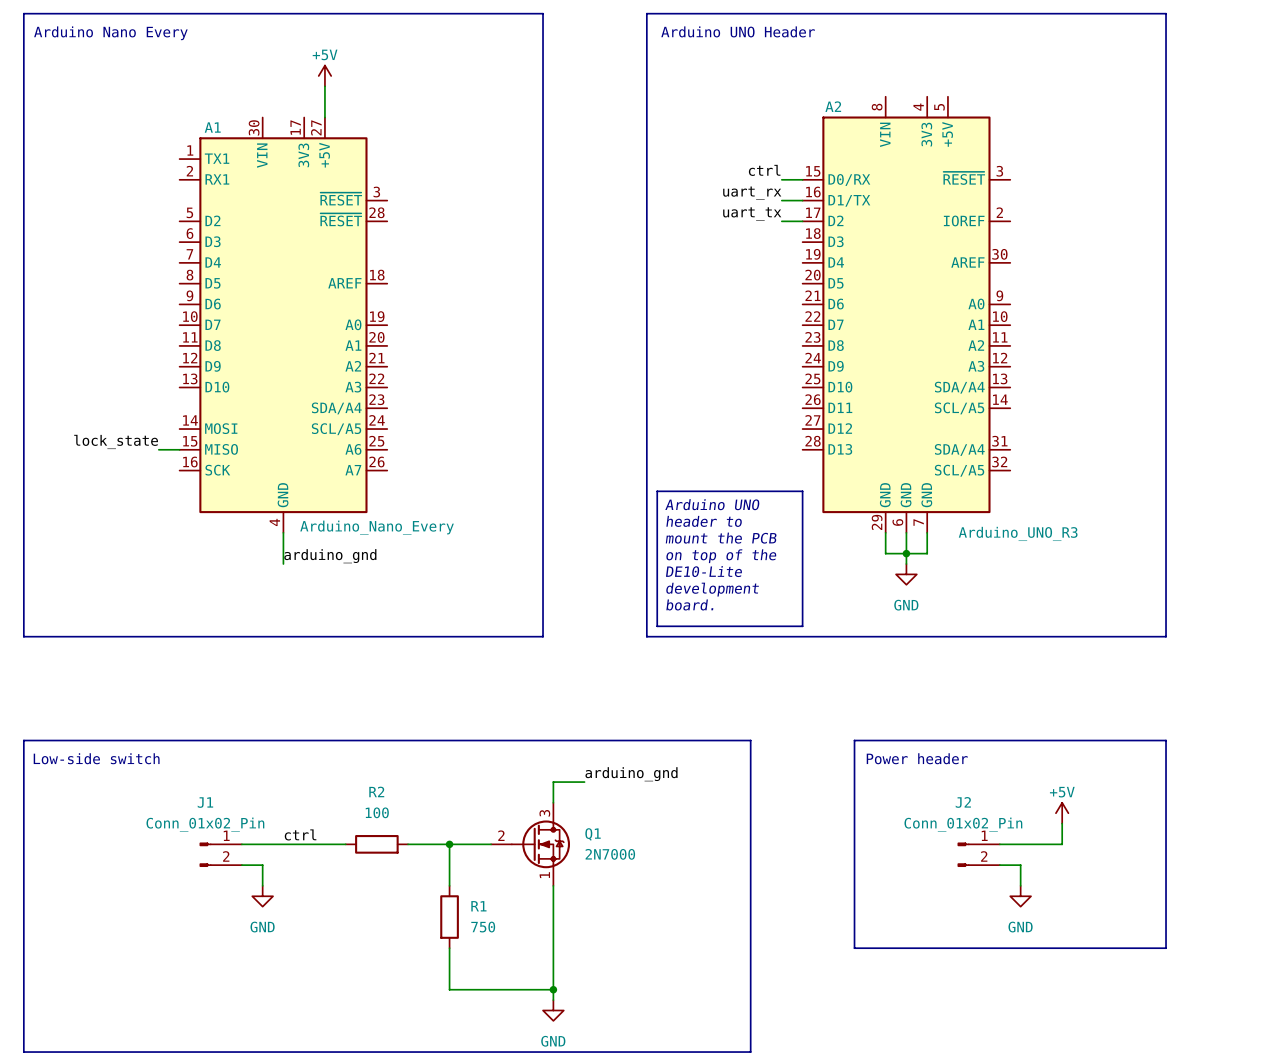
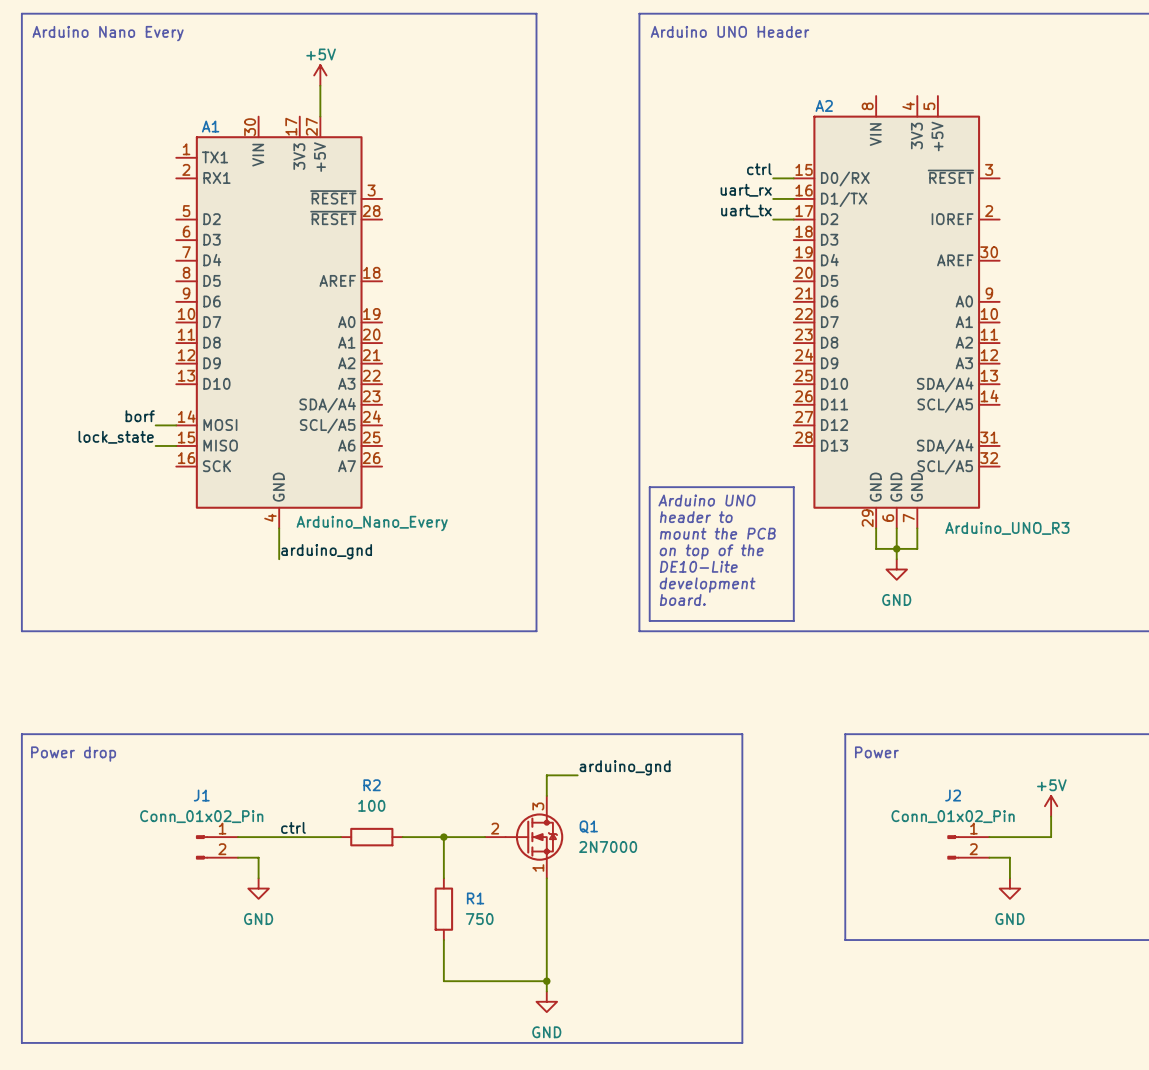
label: none -> borf (140, 416)
wire: none -> (155, 425) (176, 425)
text: Low-side switch (96, 758) -> none
text: none -> Power (876, 752)
text: Power header (917, 758) -> none
text: none -> Power drop (73, 754)

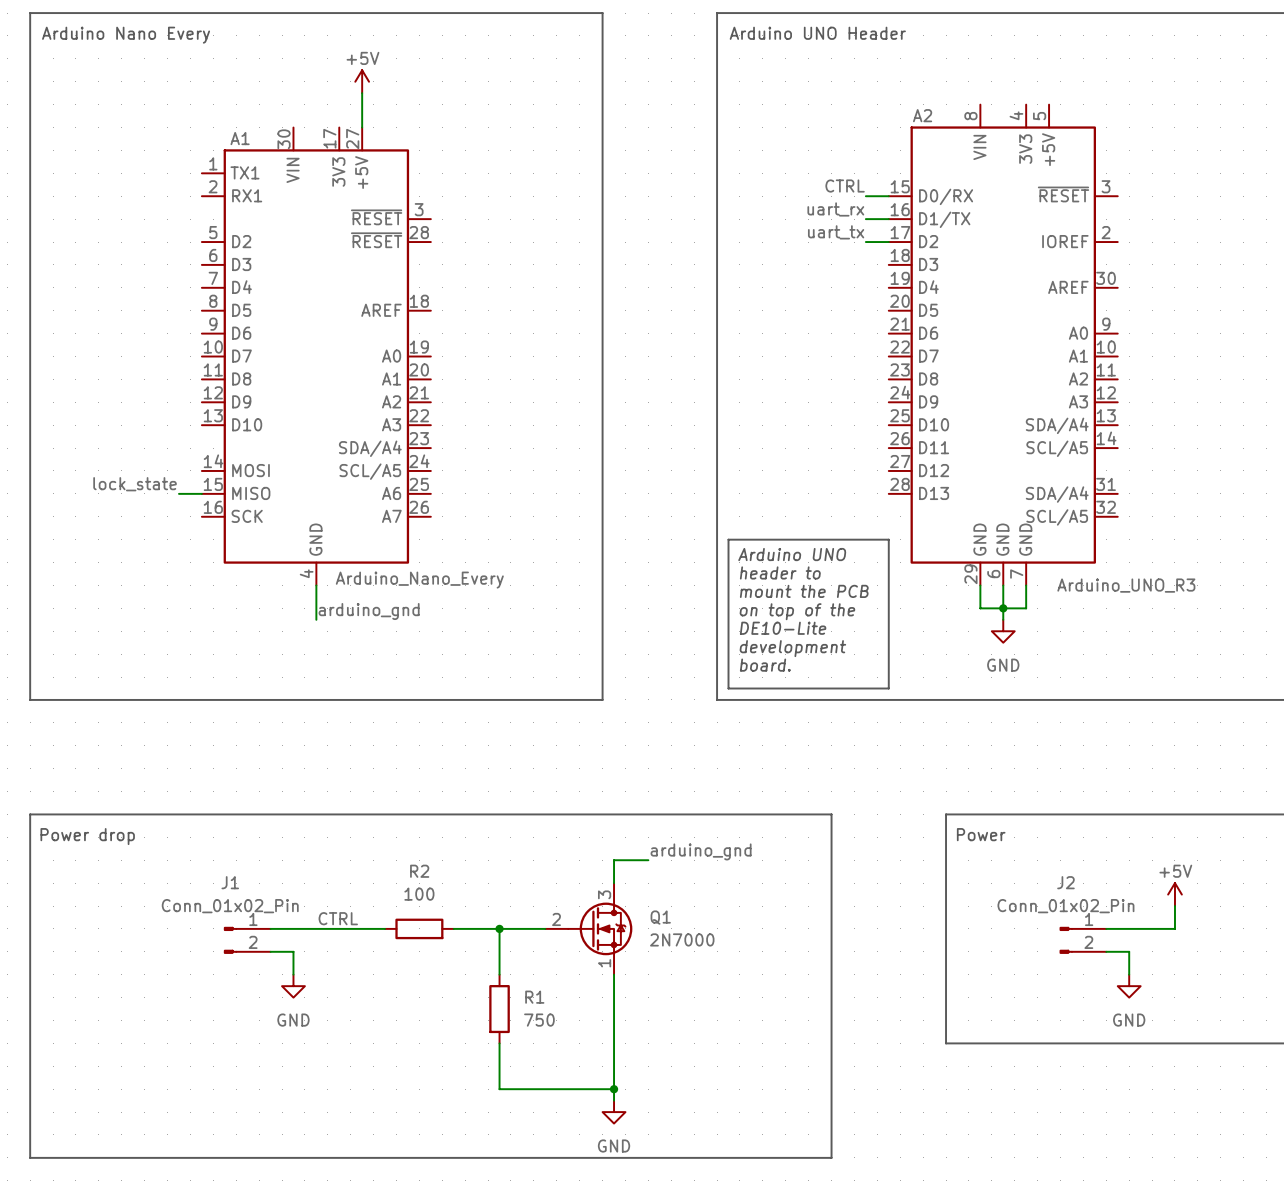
label: ctrl (759, 169) -> CTRL (845, 186)
label: borf (140, 416) -> none
wire: (155, 425) (176, 425) -> none
label: ctrl (293, 827) -> CTRL (338, 918)

